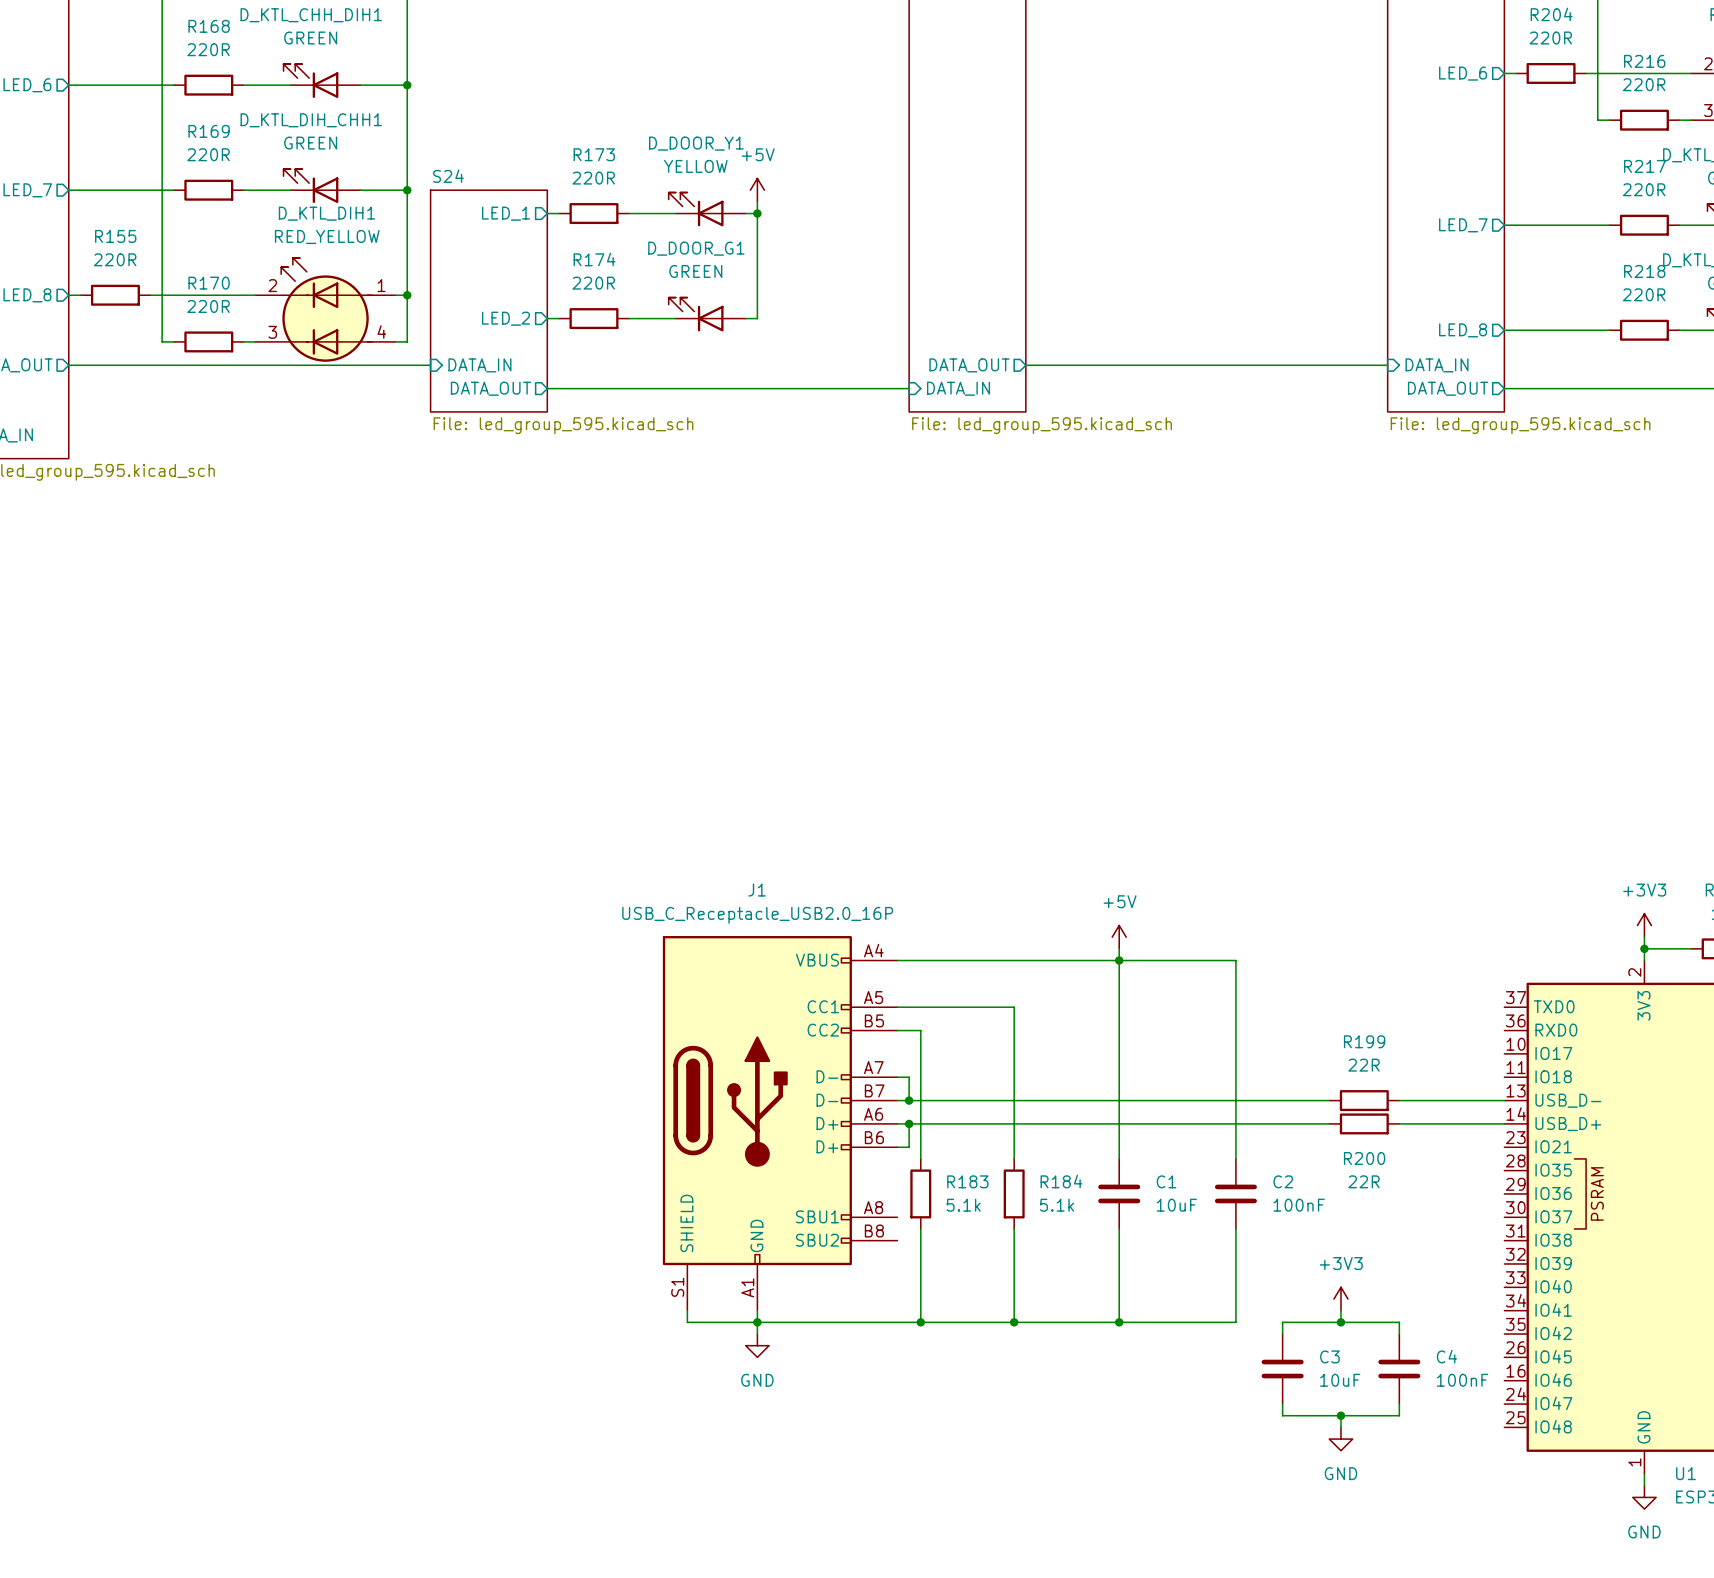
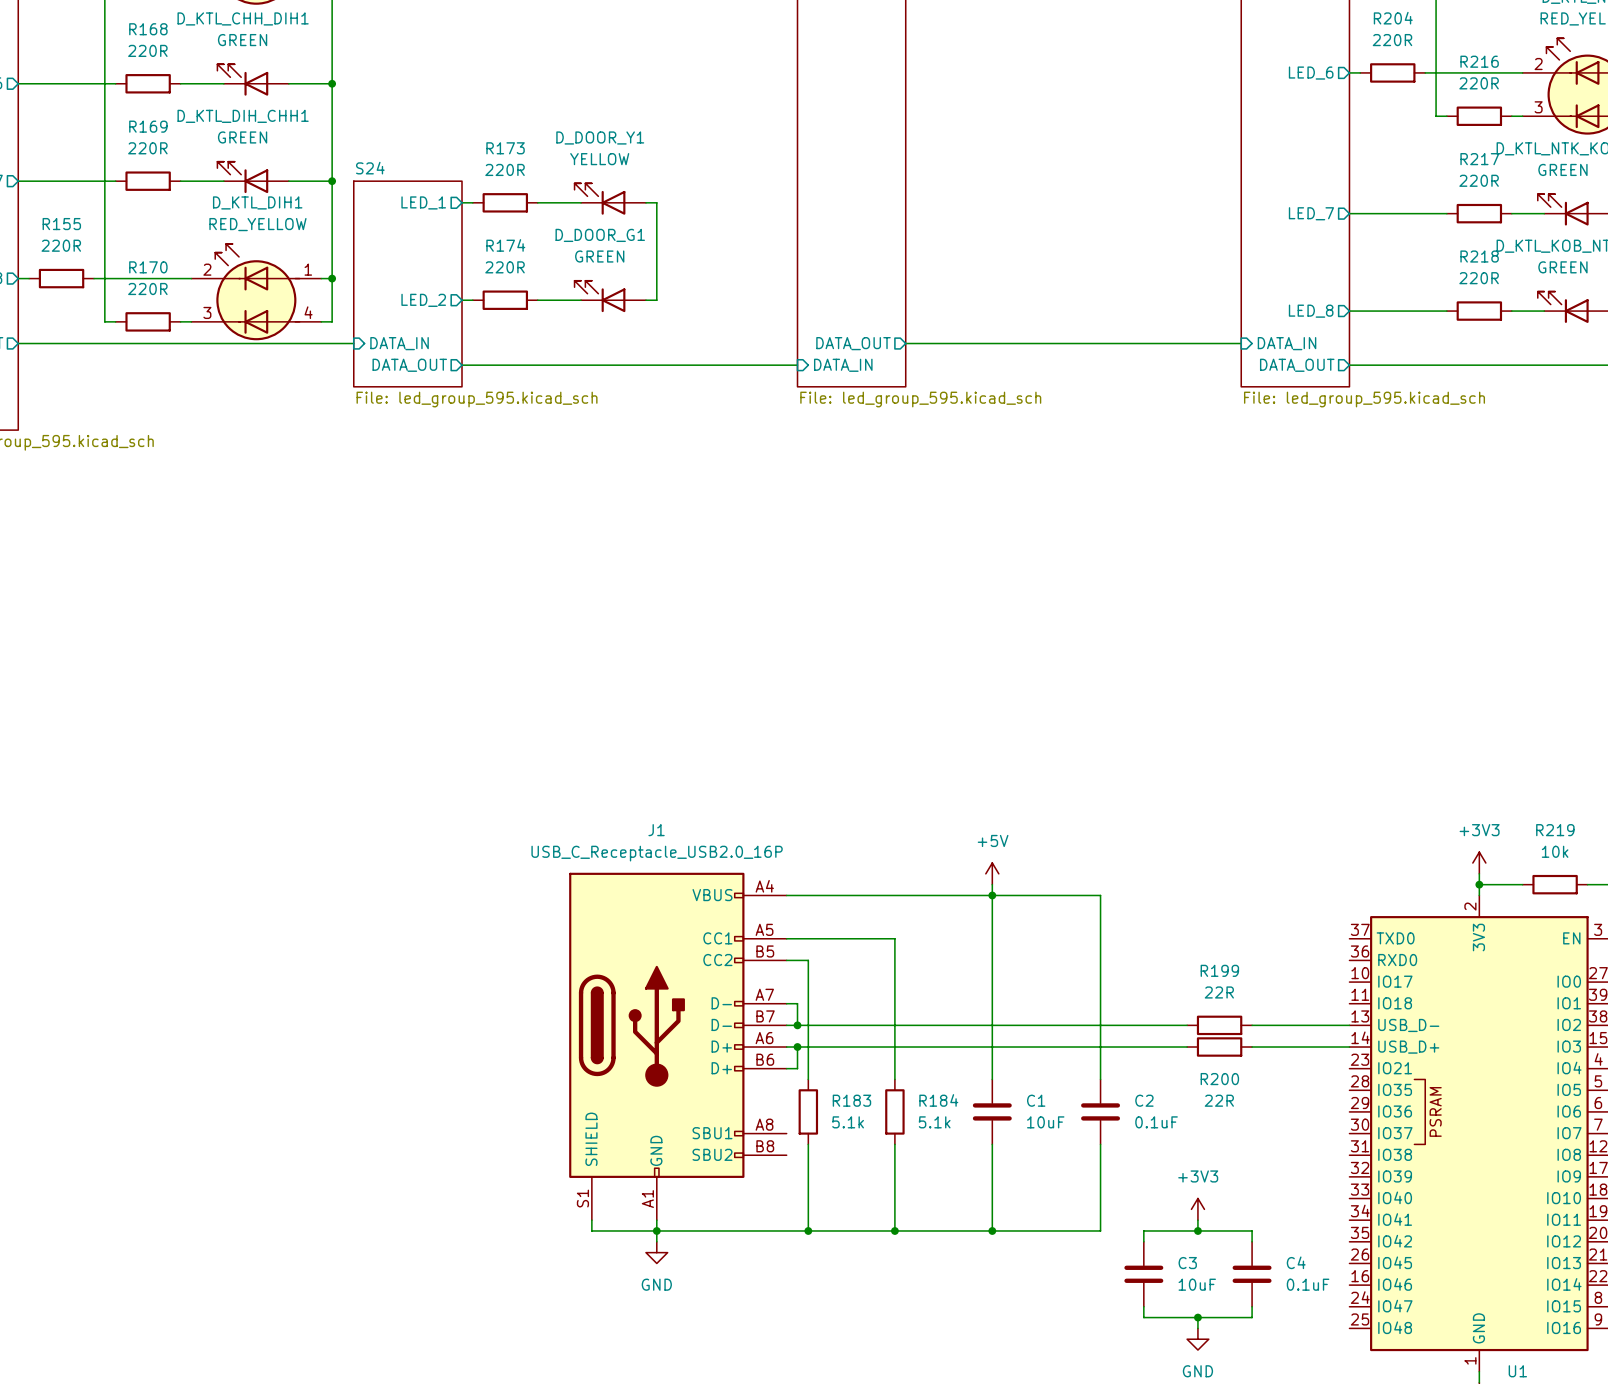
power symbol: +5V (757, 190) -> none
wire: (757, 201) (757, 213) -> none
junction: (757, 213) -> none
C2 value: 100nF (1299, 1205) -> 0.1uF (1156, 1122)
C4 value: 100nF (1462, 1380) -> 0.1uF (1308, 1284)

